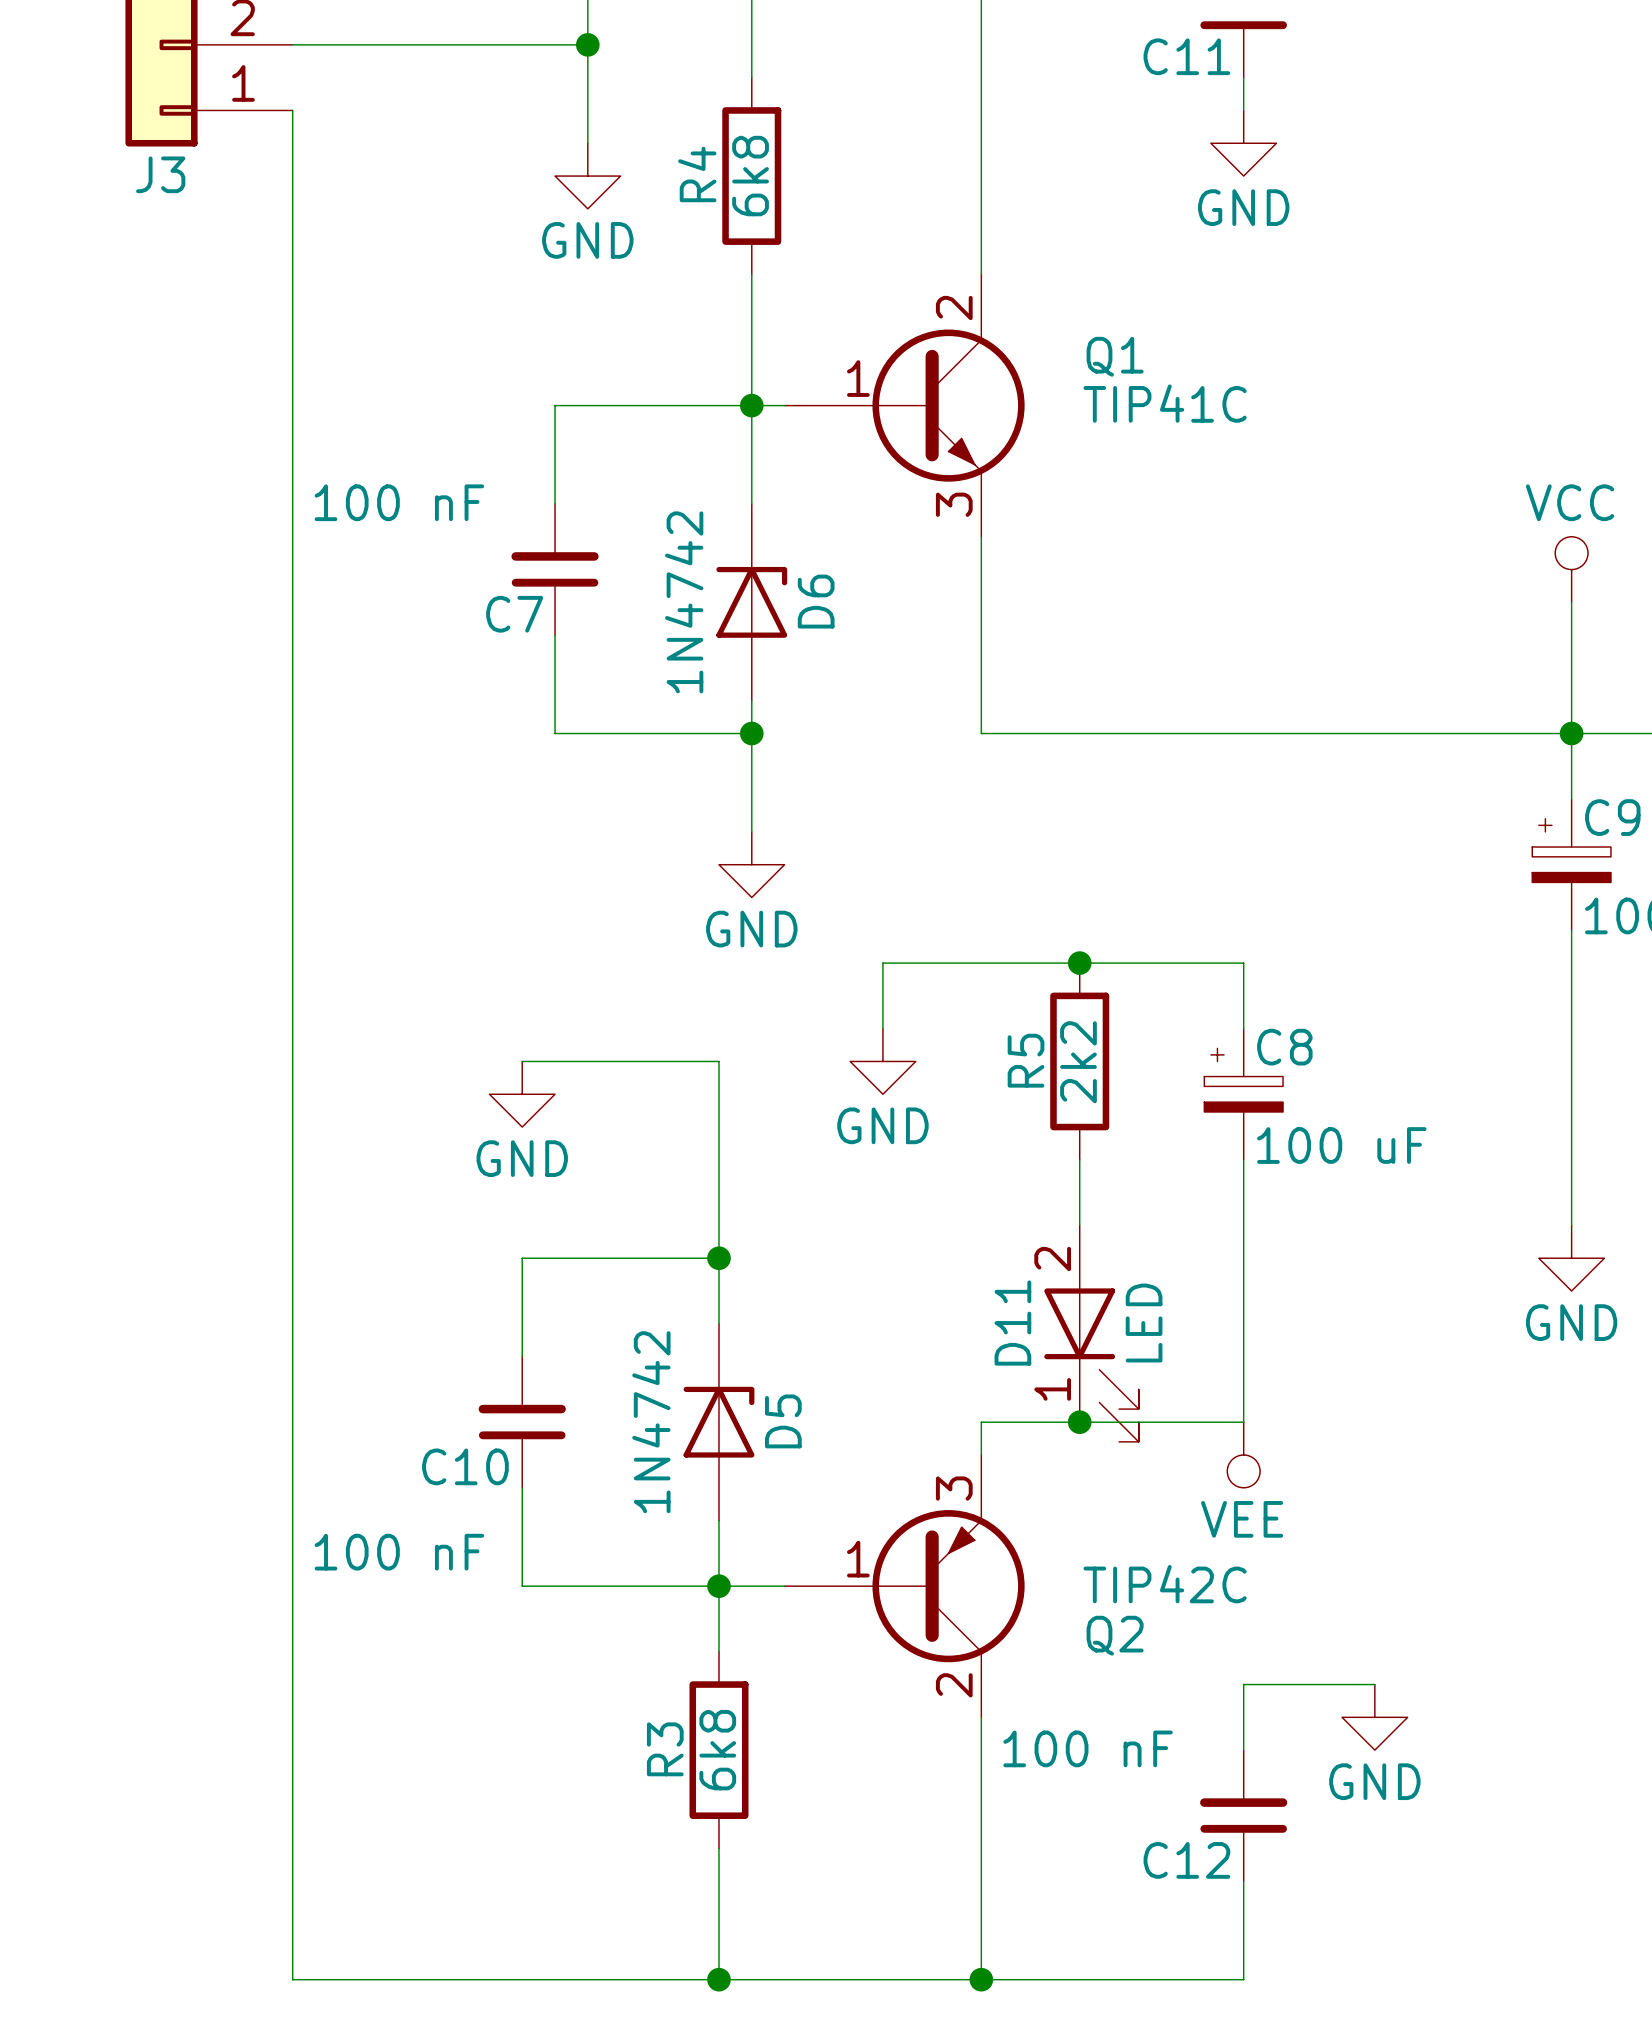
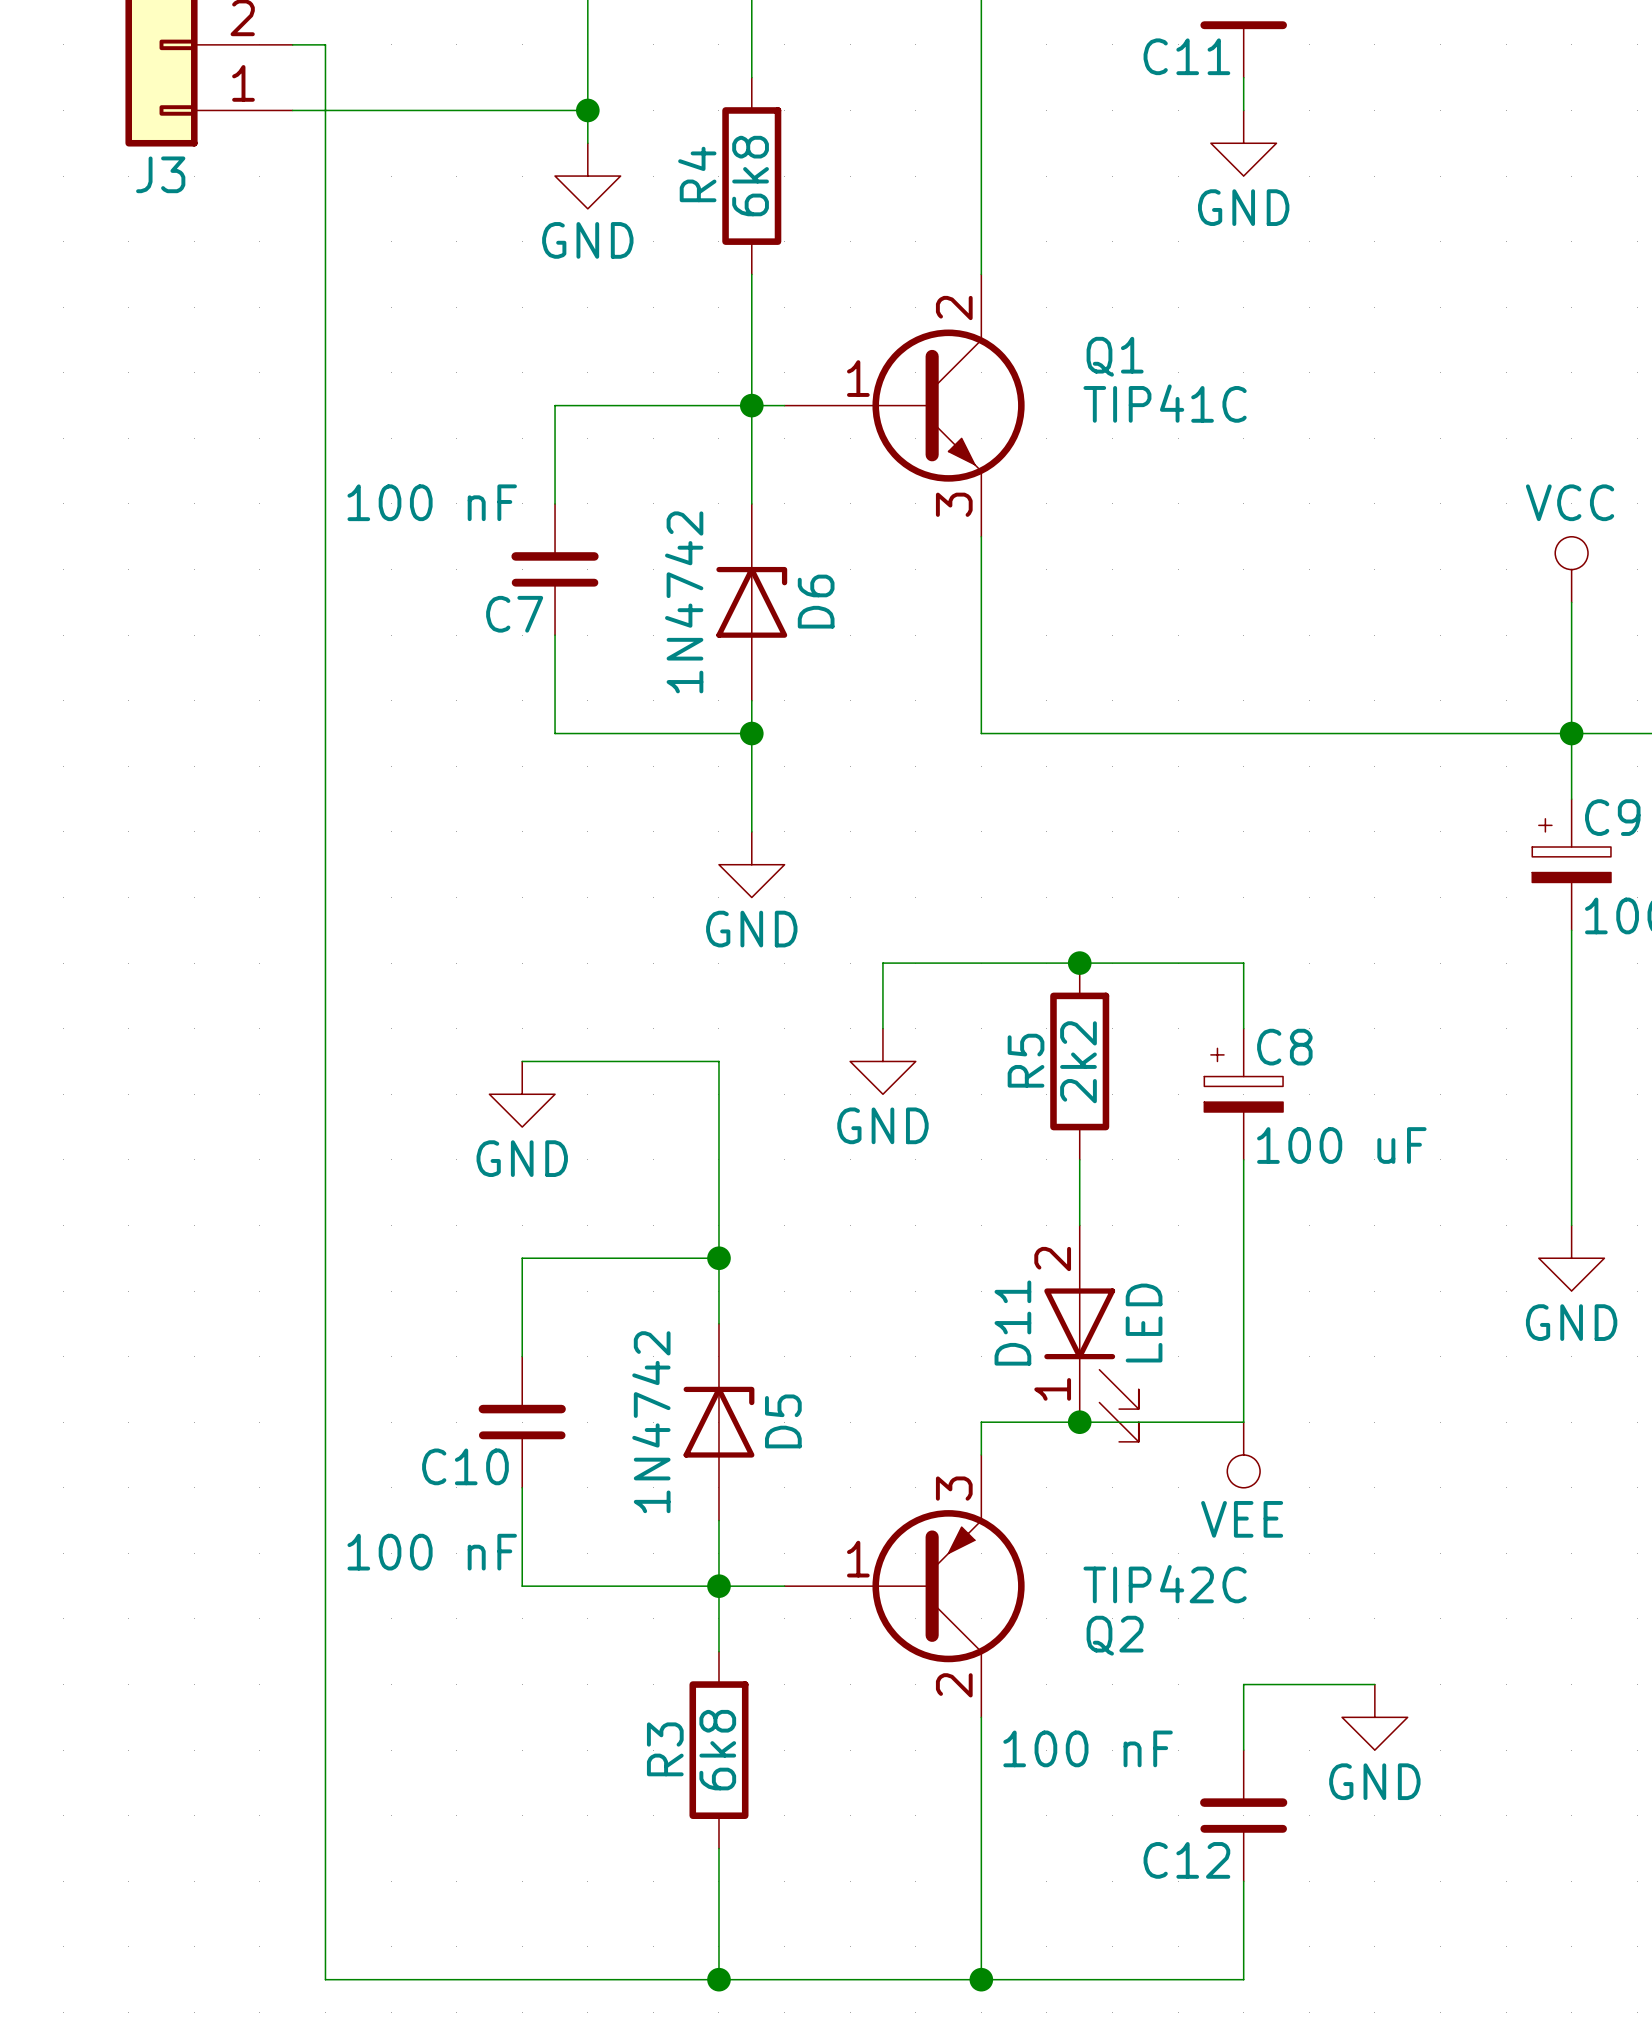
wire: (325, 44) (587, 44) -> none
junction position: (587, 44) -> (587, 110)
wire: (292, 110) (292, 1979) (325, 1979) -> (325, 44) (325, 1979)
wire: none -> (292, 110) (587, 110)
C7 value position: 100 nF (399, 502) -> 100 nF (432, 502)
C10 value position: 100 nF (399, 1552) -> 100 nF (432, 1552)

